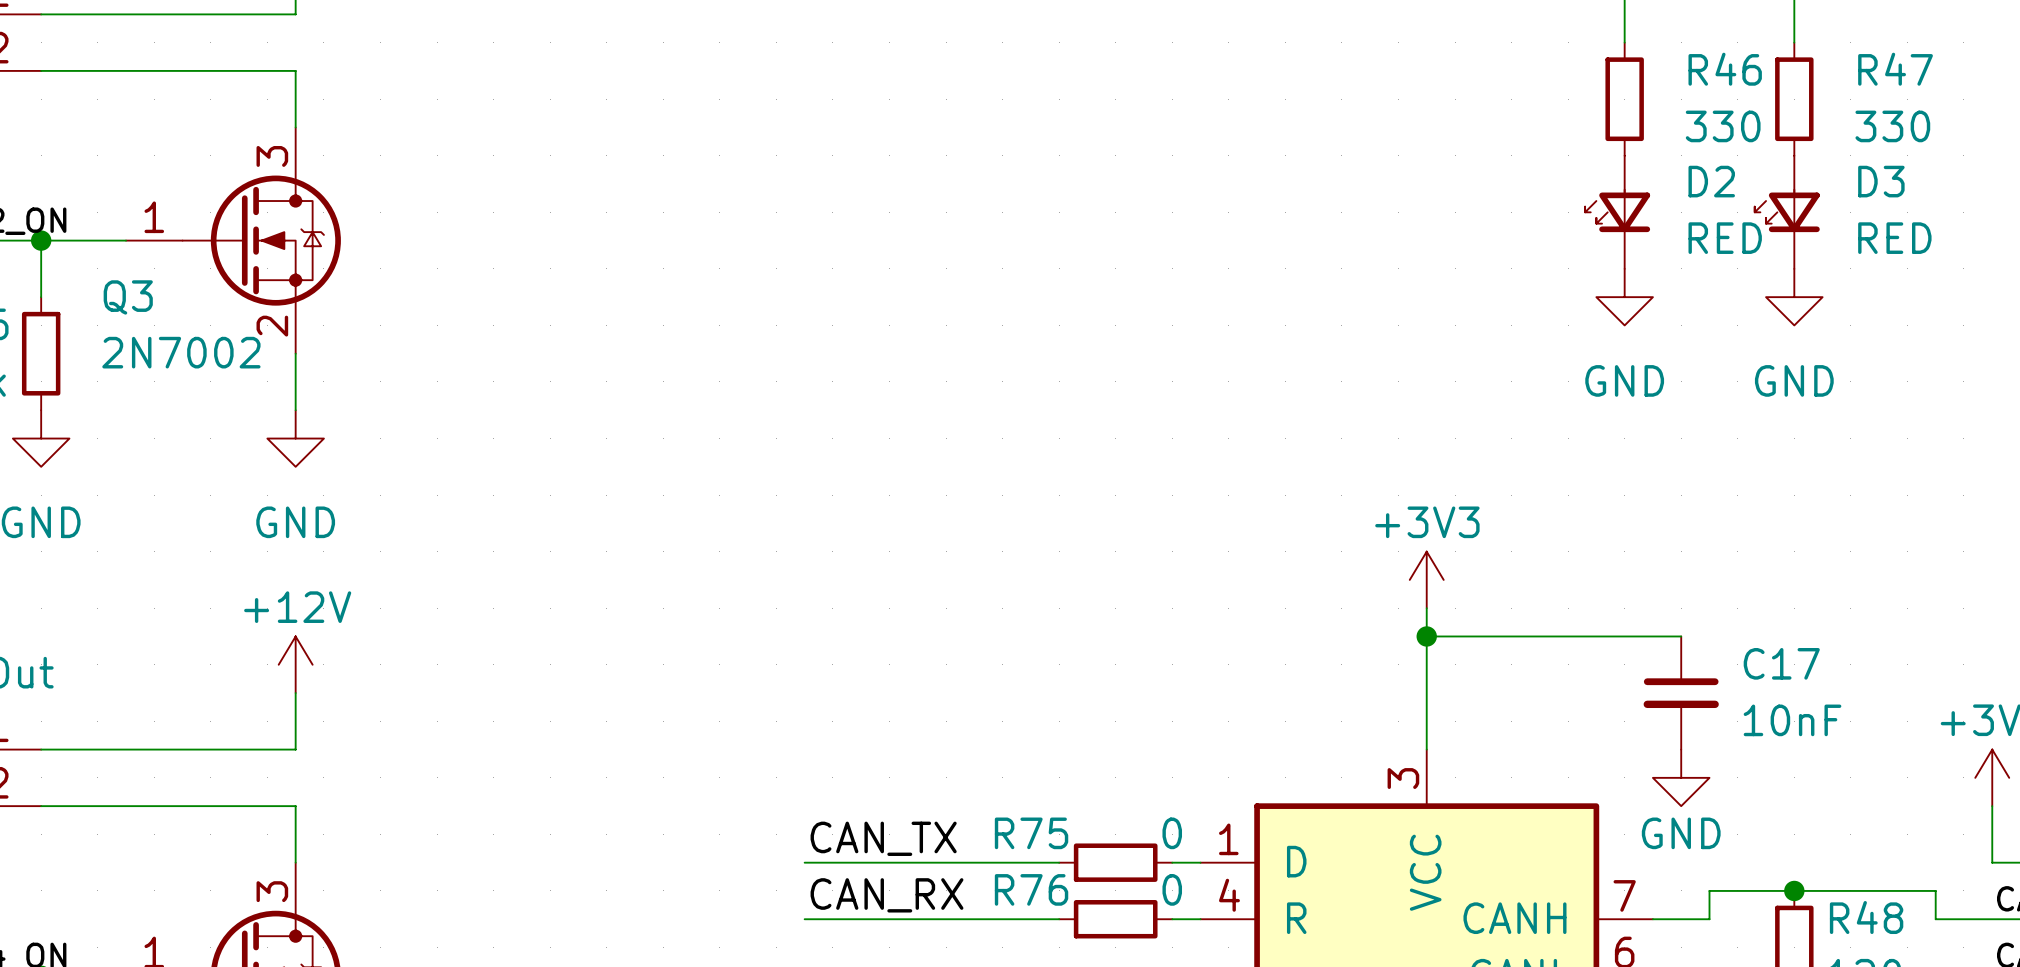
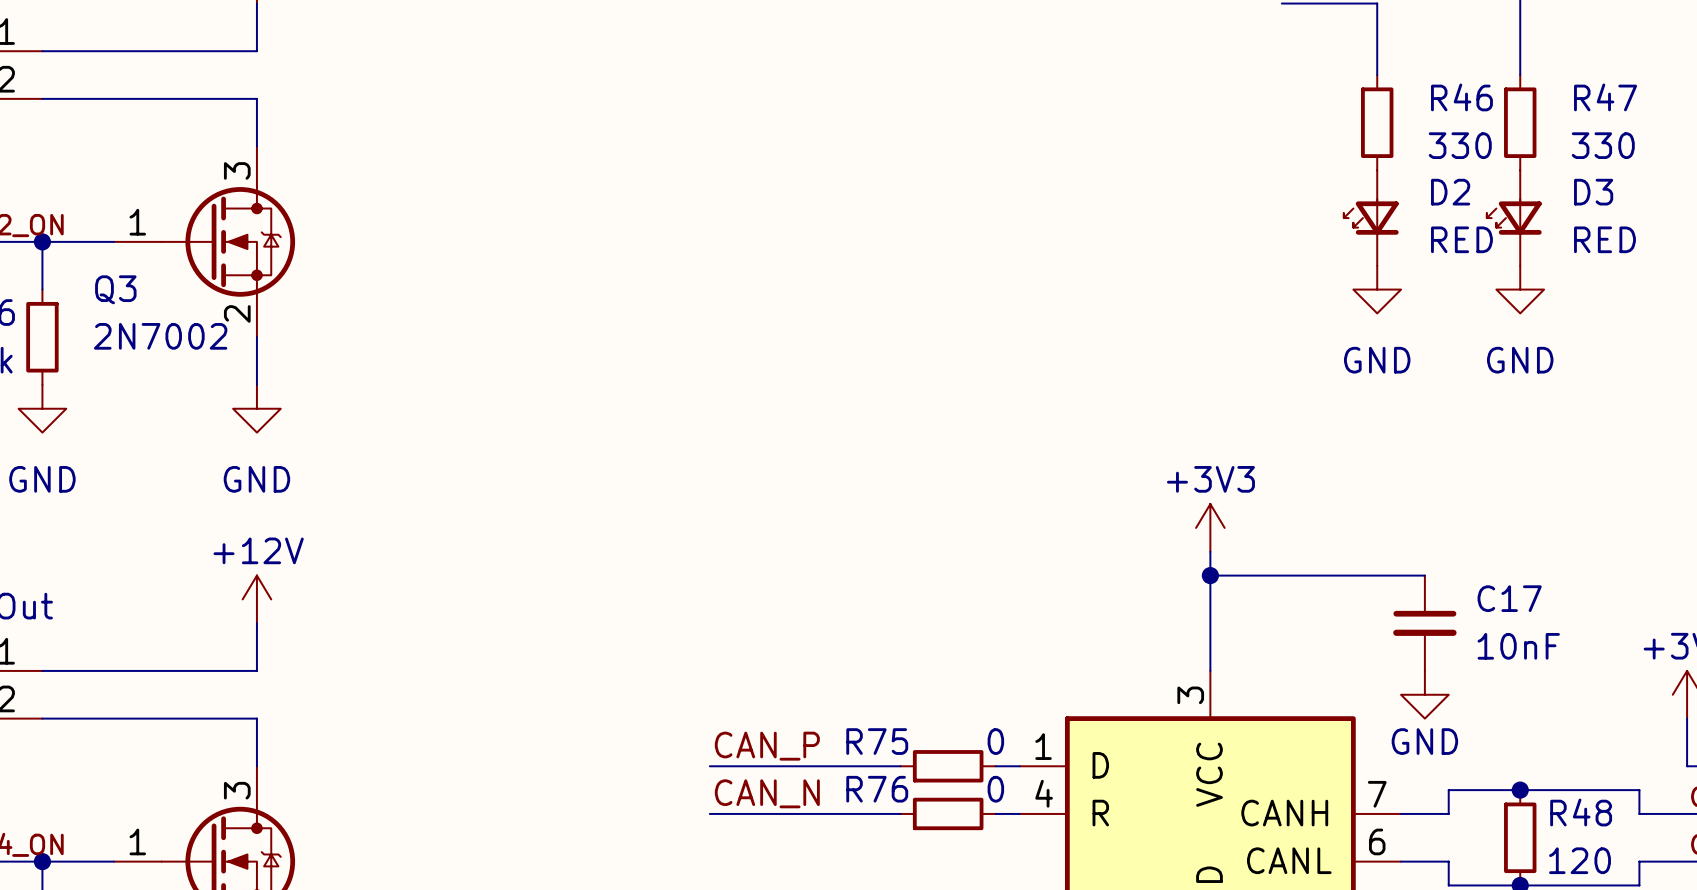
label: CAN_TX (883, 838) -> CAN_P (767, 746)
wire: (804, 862) (832, 862) -> none
label: CAN_RX (886, 895) -> CAN_N (767, 793)
wire: (804, 919) (832, 919) -> none

